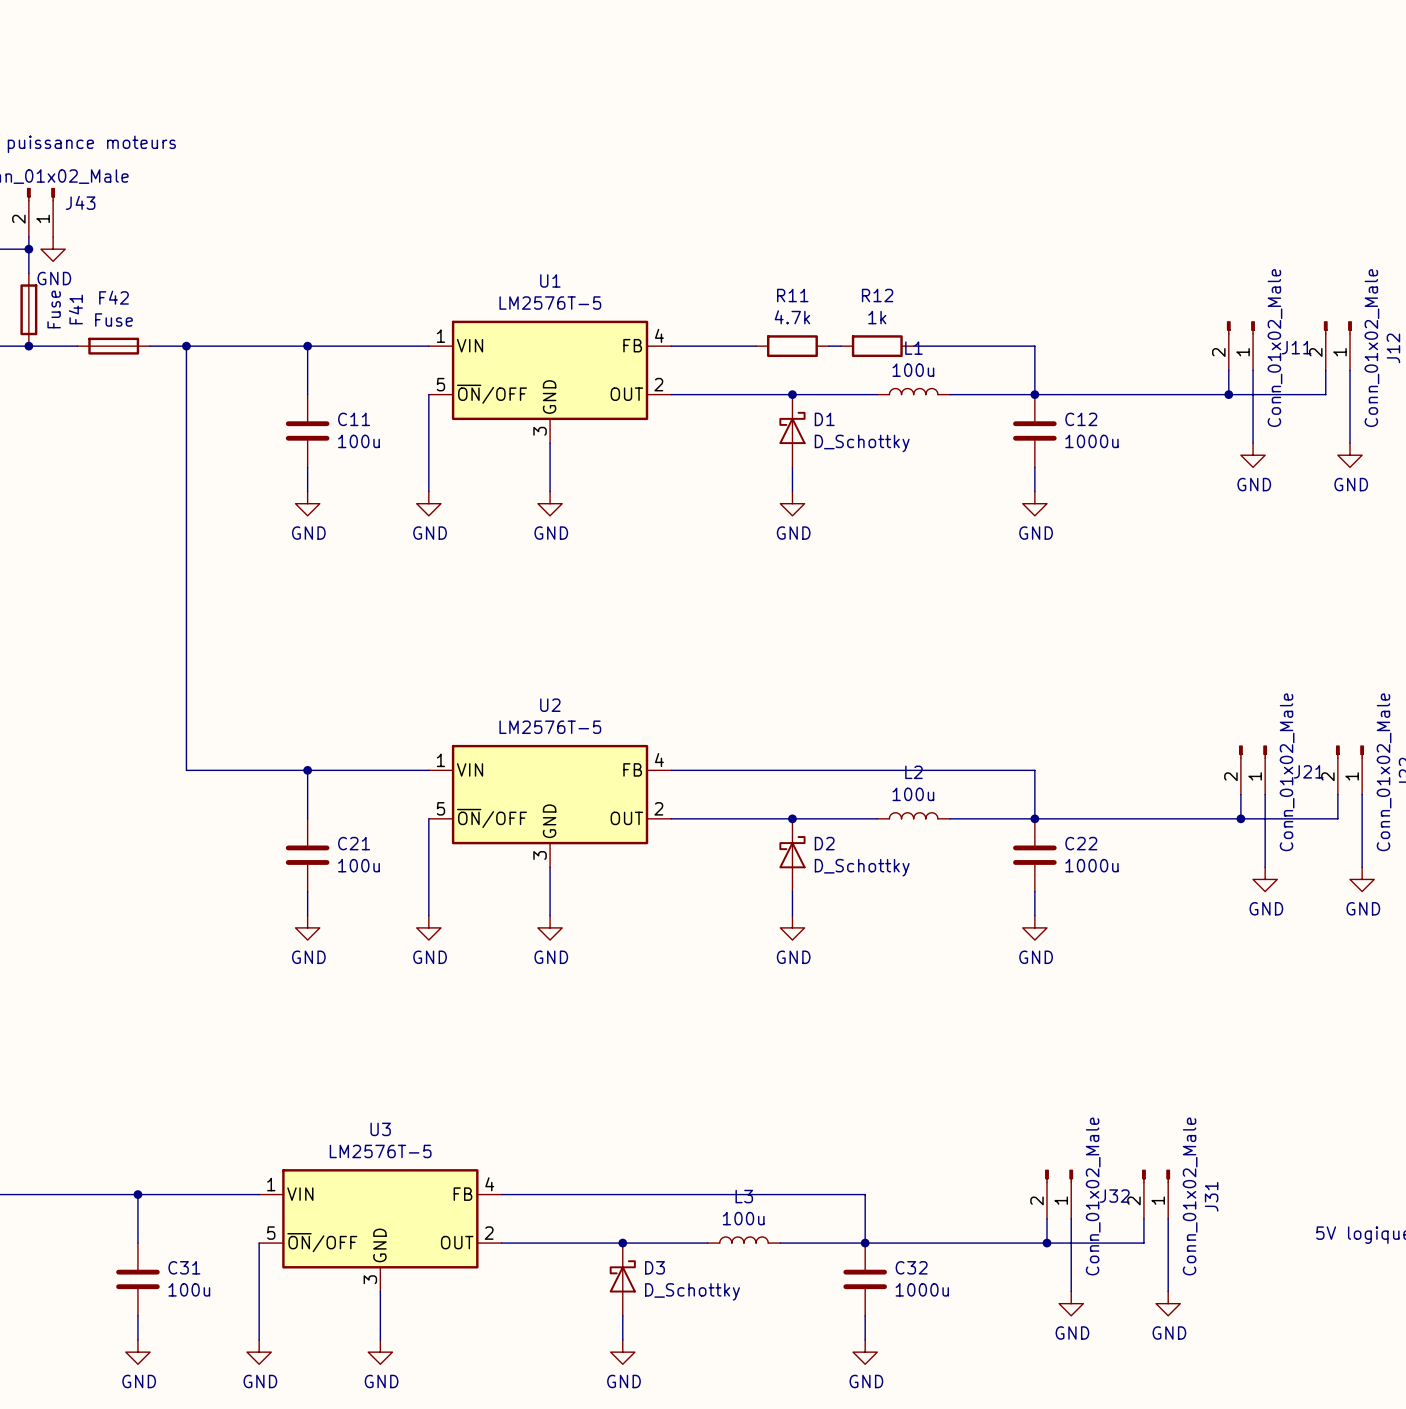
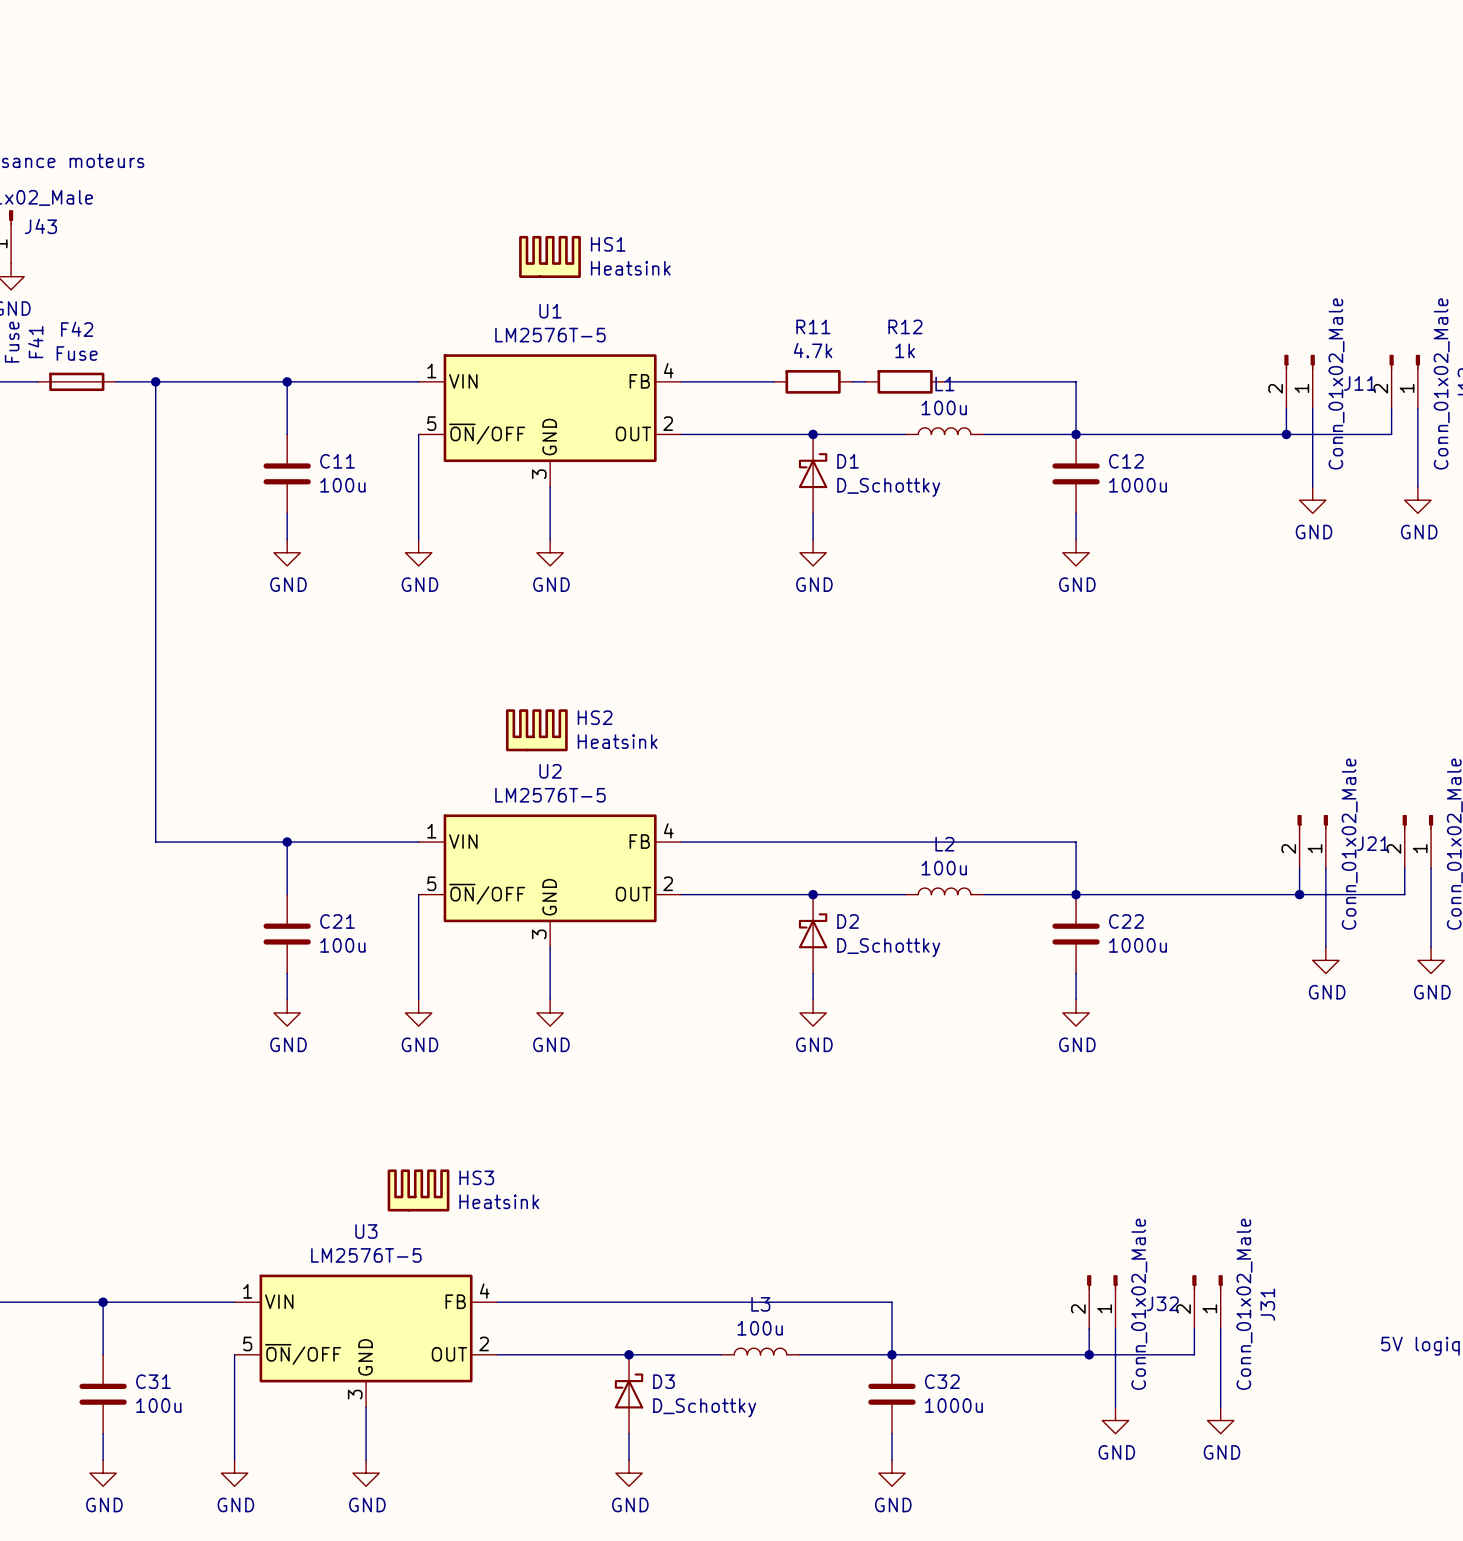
HS1: none -> Heatsink (550, 256)
HS2: none -> Heatsink (536, 730)
HS3: none -> Heatsink (418, 1190)

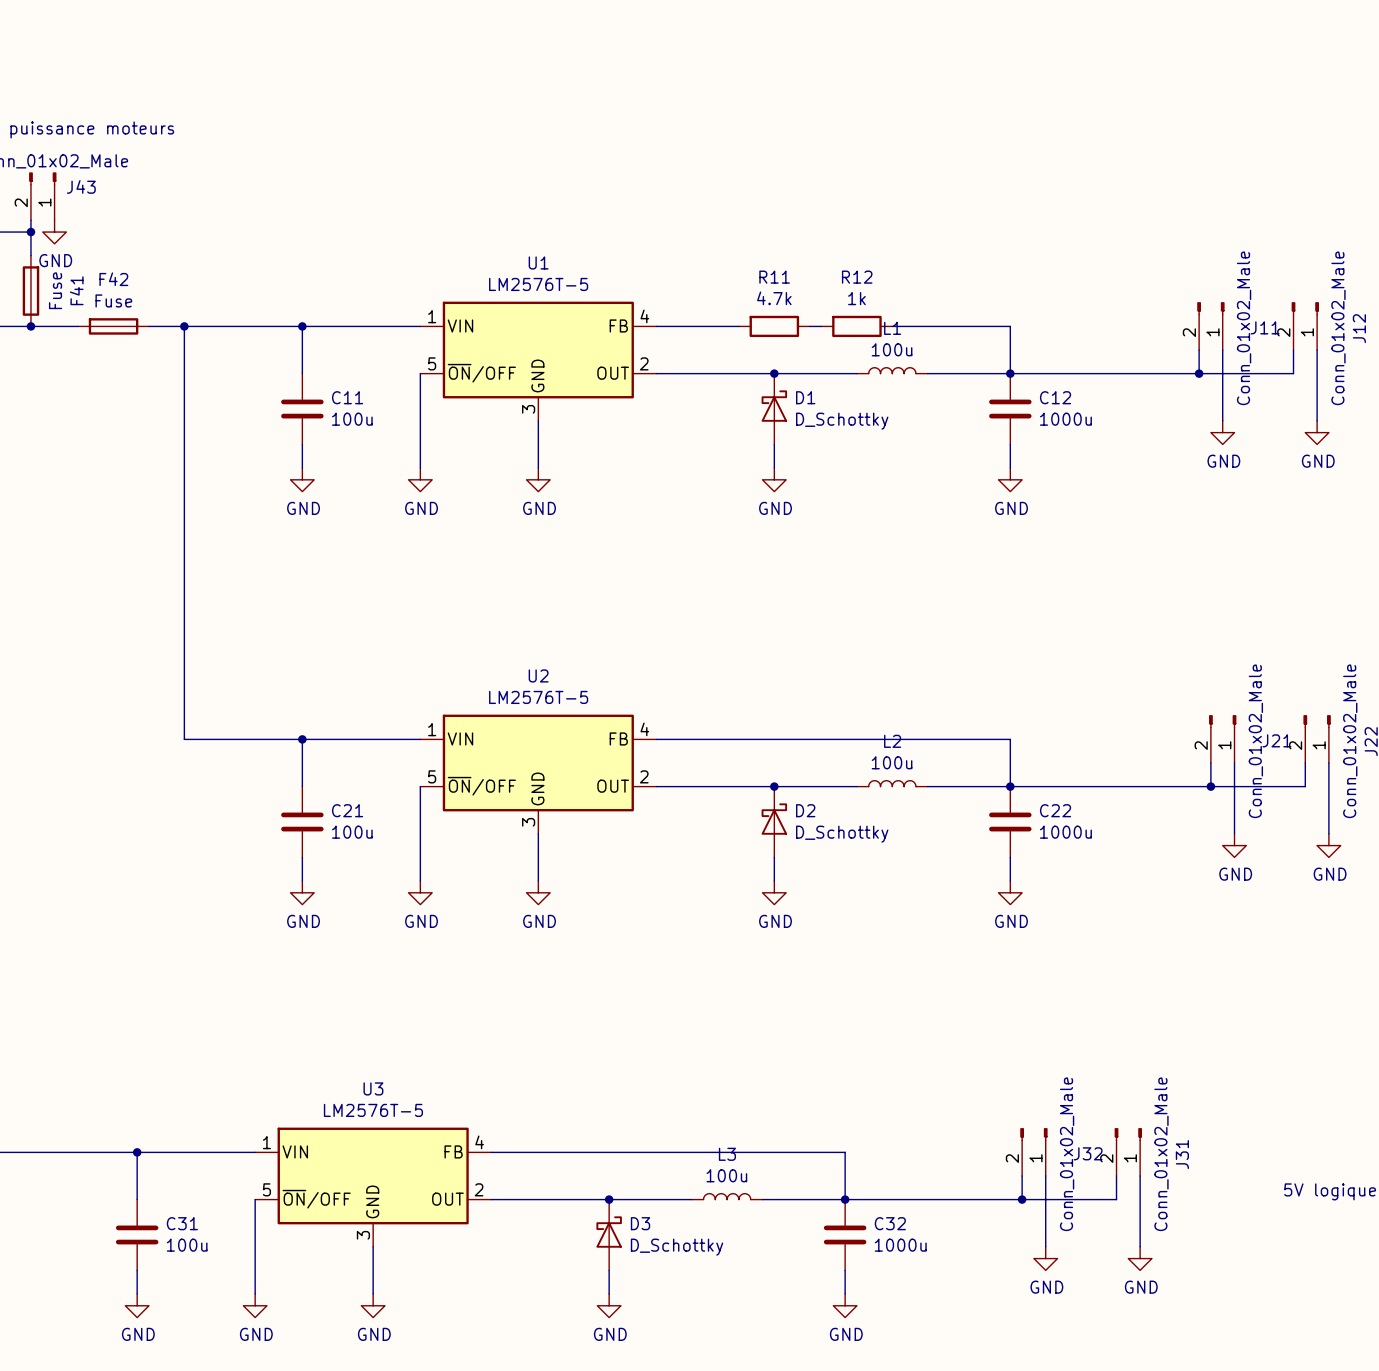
HS1: Heatsink (550, 256) -> none
HS2: Heatsink (536, 730) -> none
HS3: Heatsink (418, 1190) -> none

